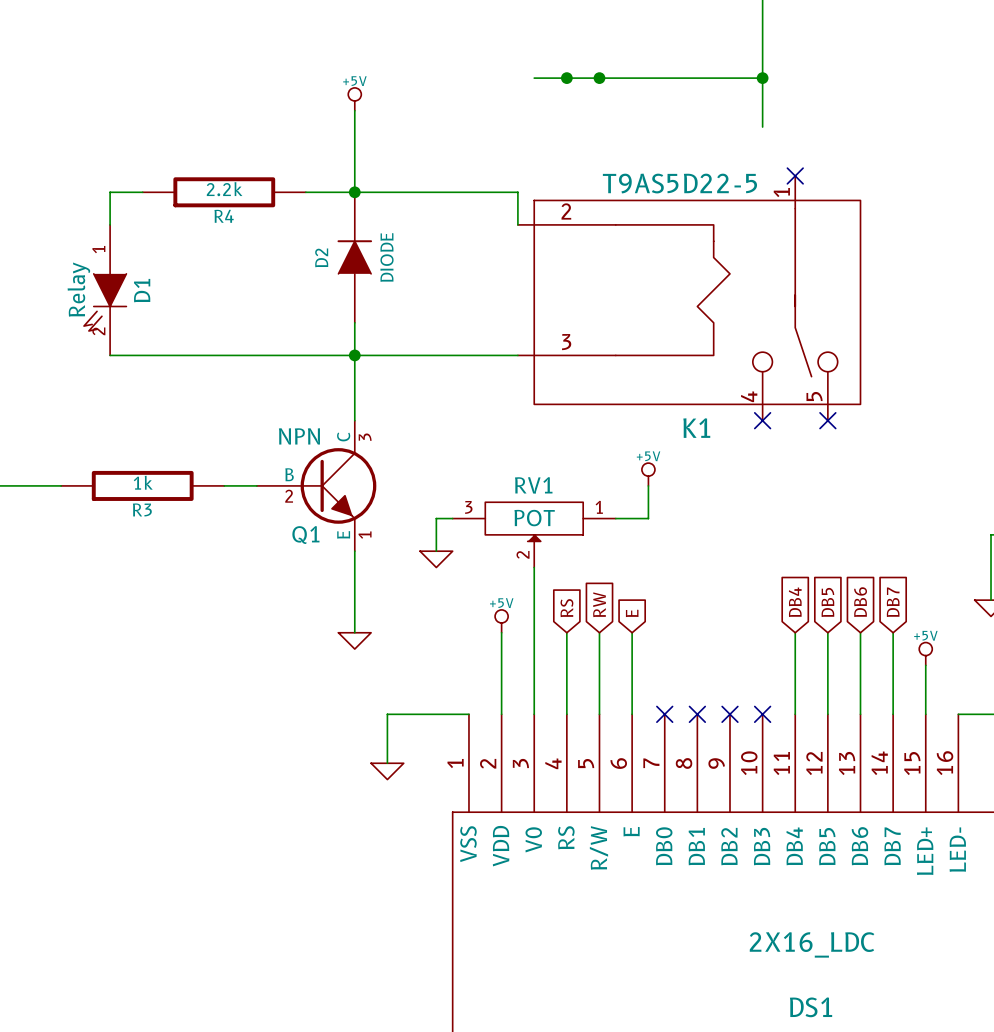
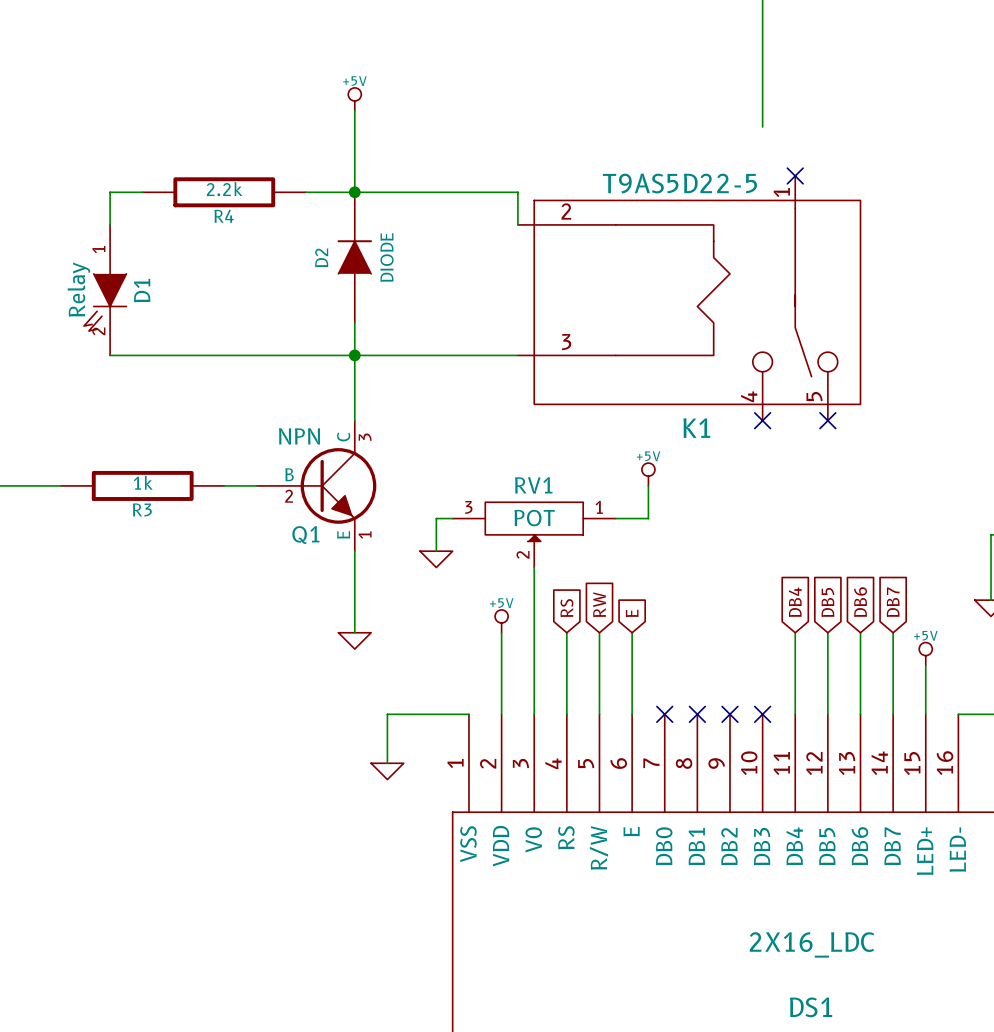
wire: (534, 78) (762, 78) -> none
junction: (566, 78) -> none
junction: (599, 78) -> none
junction: (762, 78) -> none

